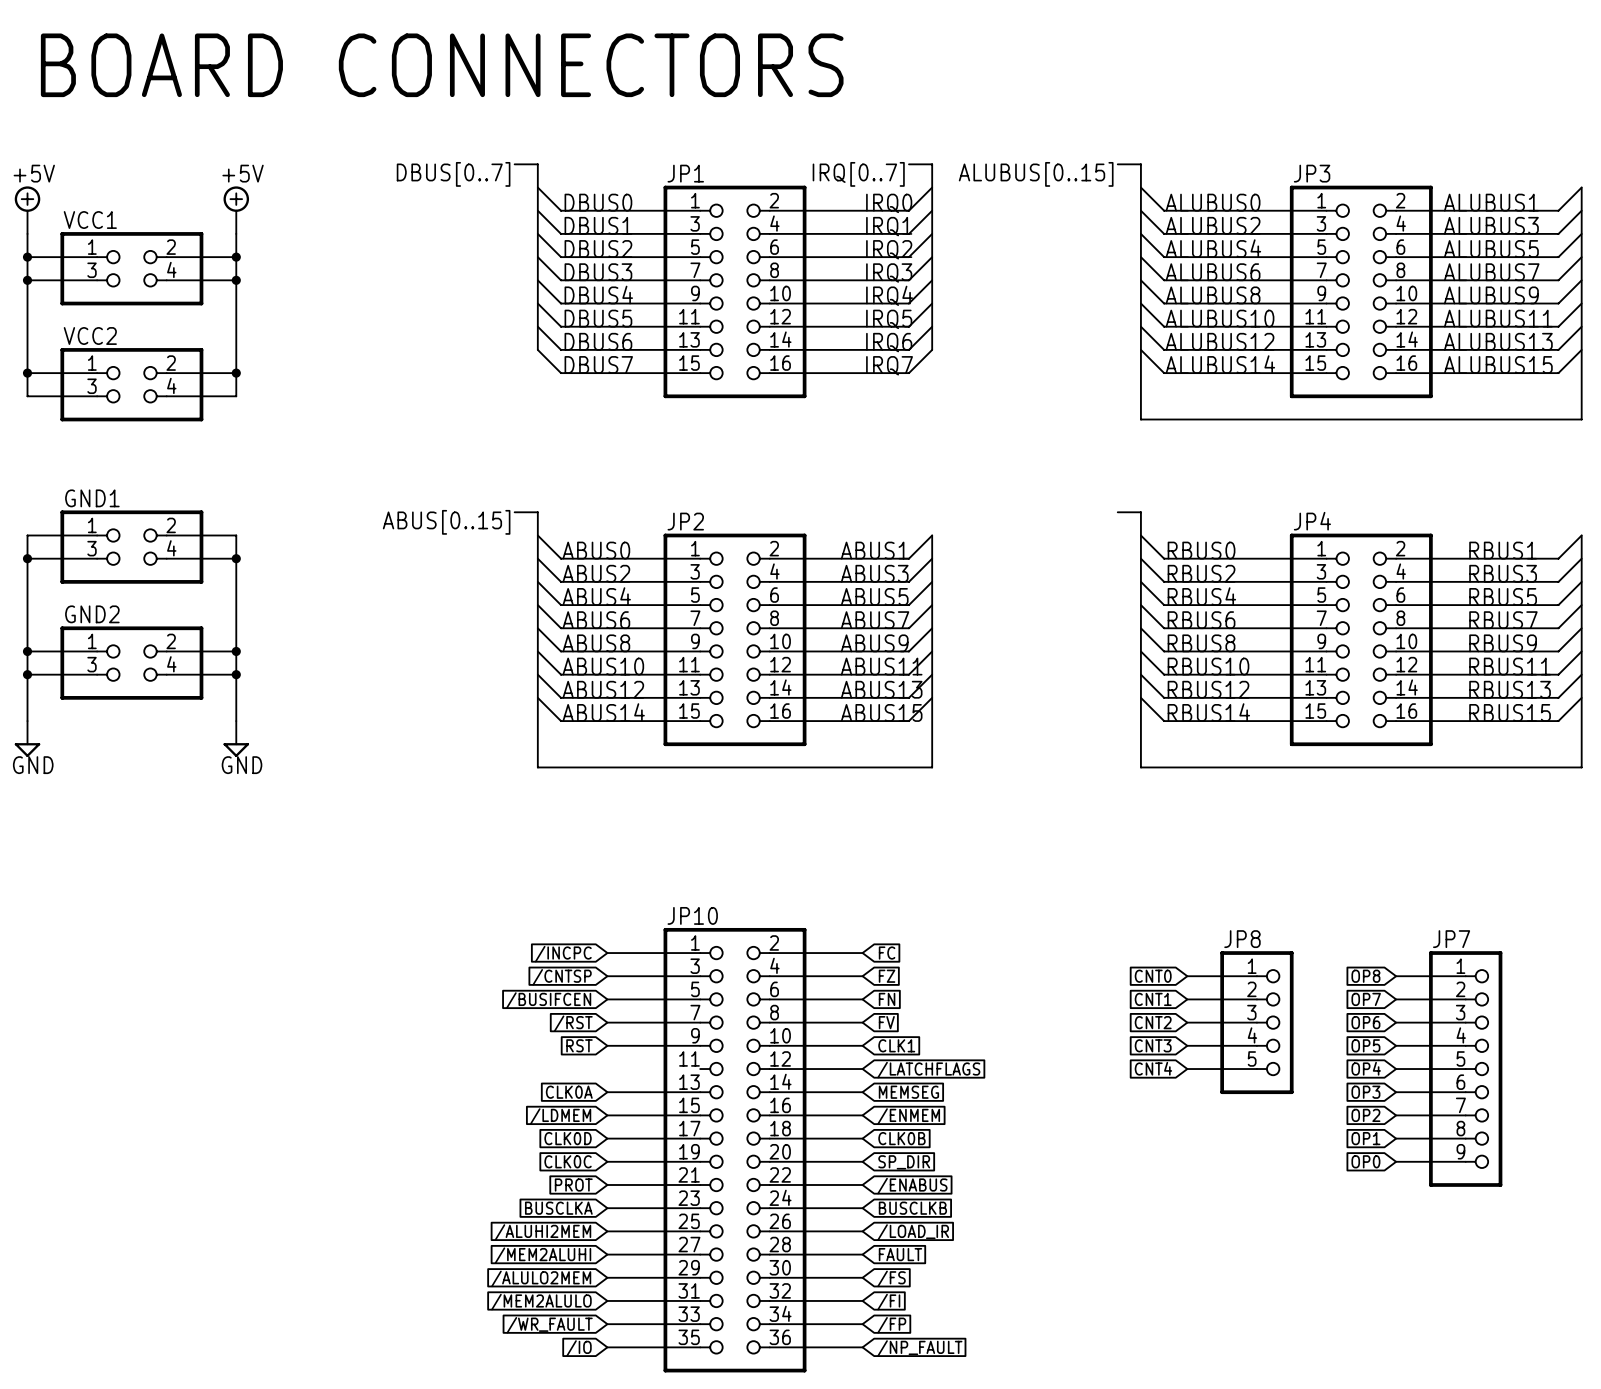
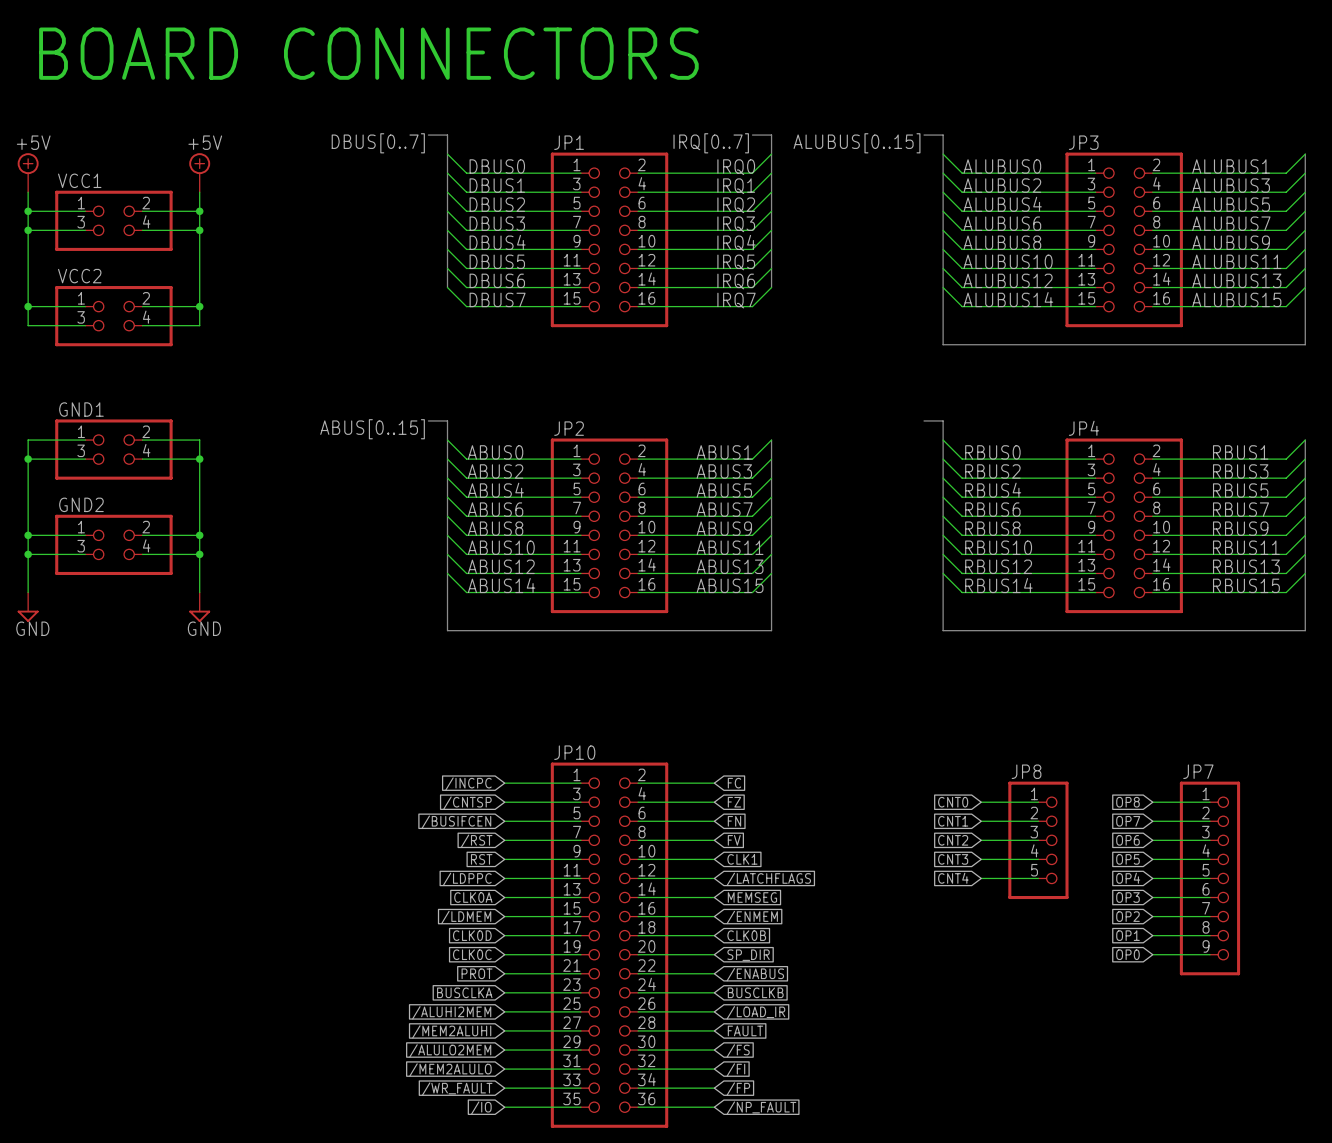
wire: none -> (504, 878) (580, 878)
global label: none -> /LDPPC (467, 879)

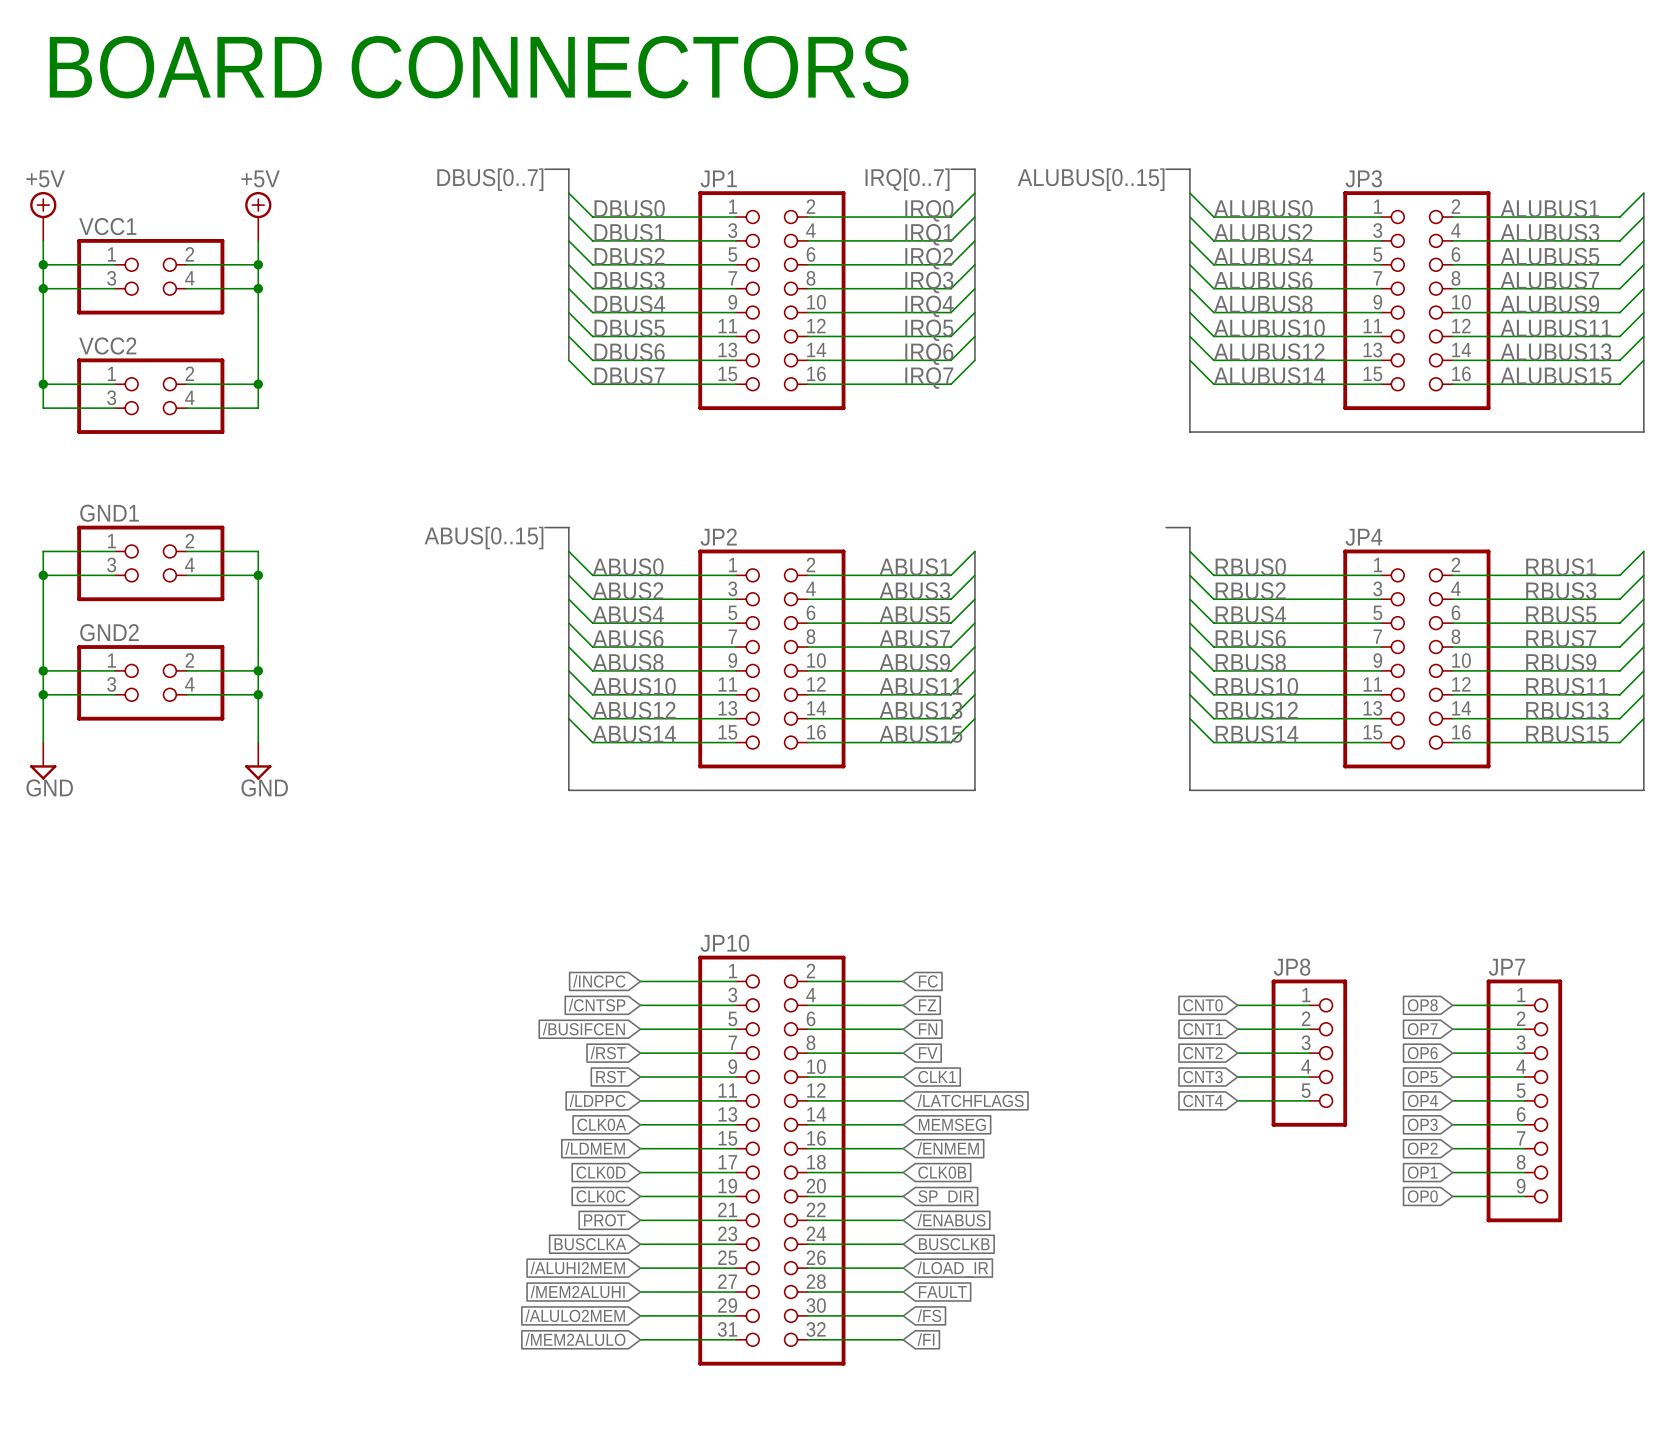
JP10 symbol: [550, 762, 669, 1128] -> [698, 955, 846, 1366]
wire: (504, 1088) (580, 1088) -> none
wire: (638, 1088) (714, 1088) -> none
global label: /WR_FAULT (457, 1089) -> none
global label: /FP (738, 1089) -> none
wire: (504, 1107) (580, 1107) -> none
wire: (638, 1107) (714, 1107) -> none
global label: /IO (481, 1108) -> none
global label: /NP_FAULT (761, 1108) -> none

